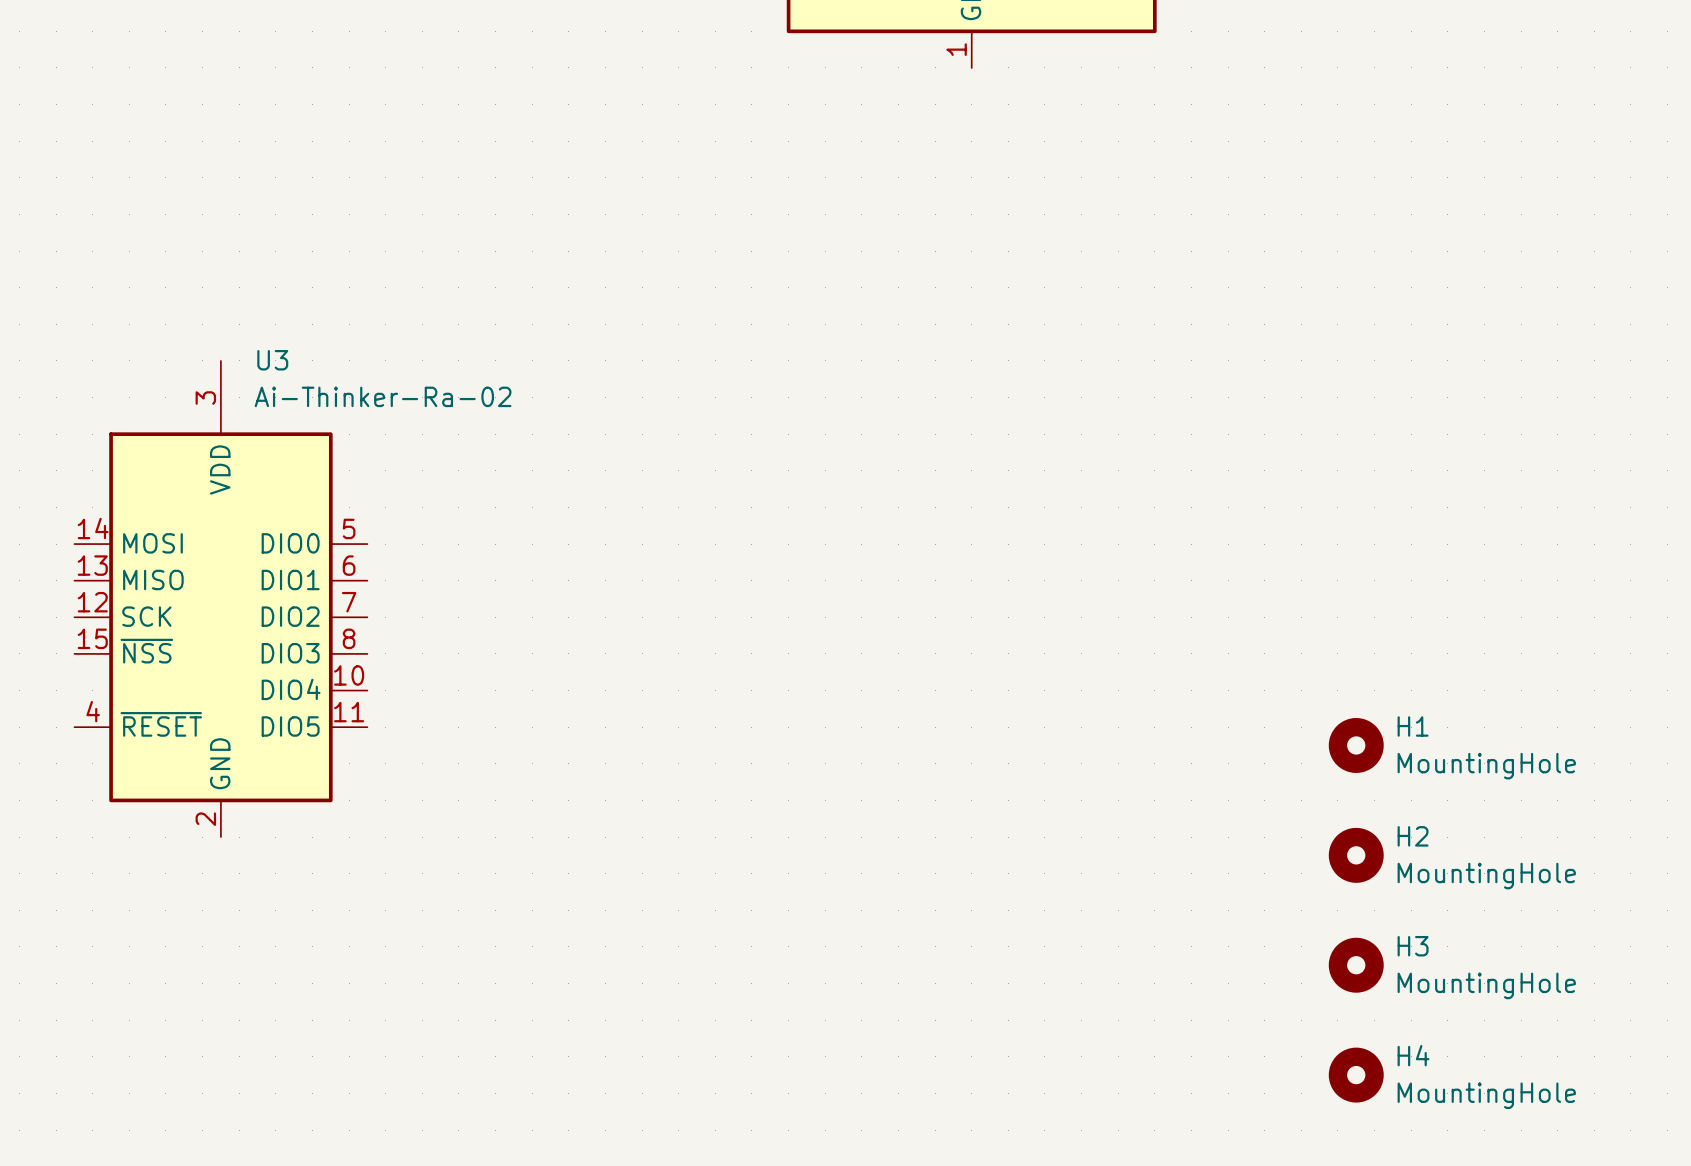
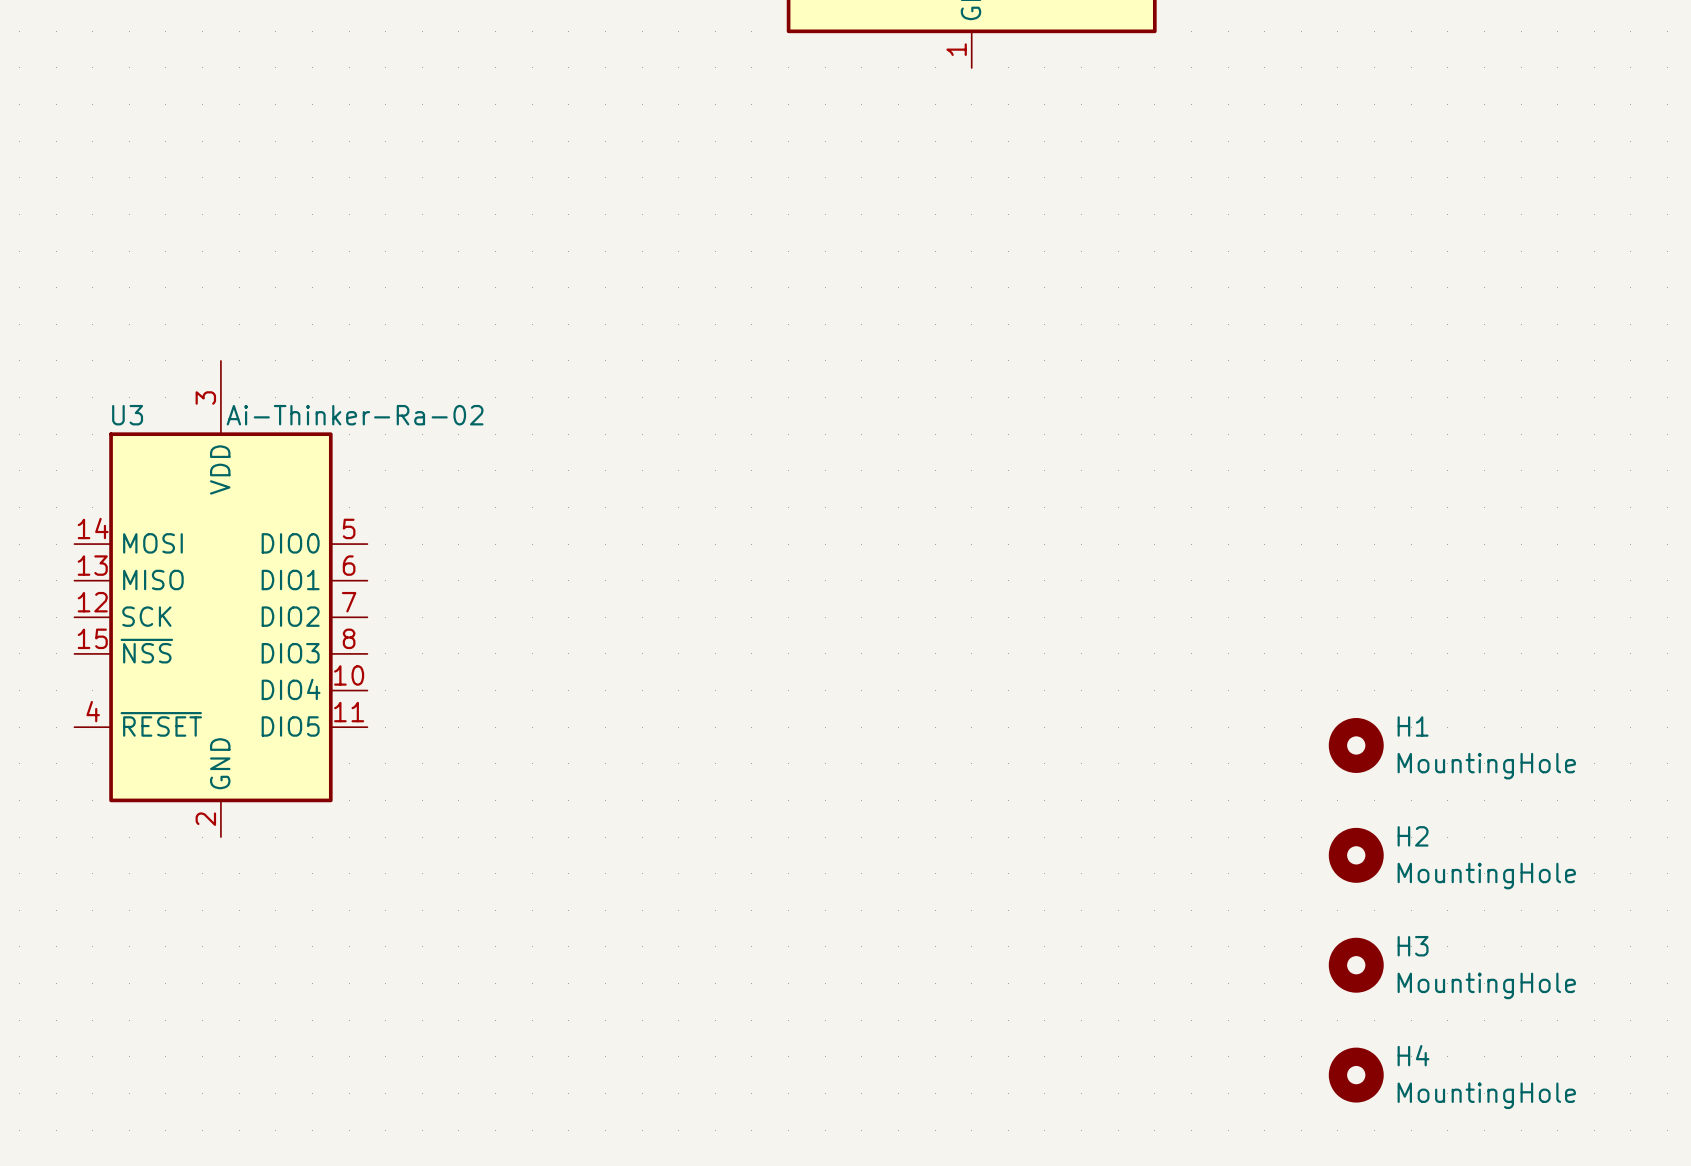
U3 name position: U3 (272, 360) -> U3 (127, 415)
U3 value position: Ai-Thinker-Ra-02 (383, 396) -> Ai-Thinker-Ra-02 (355, 415)

